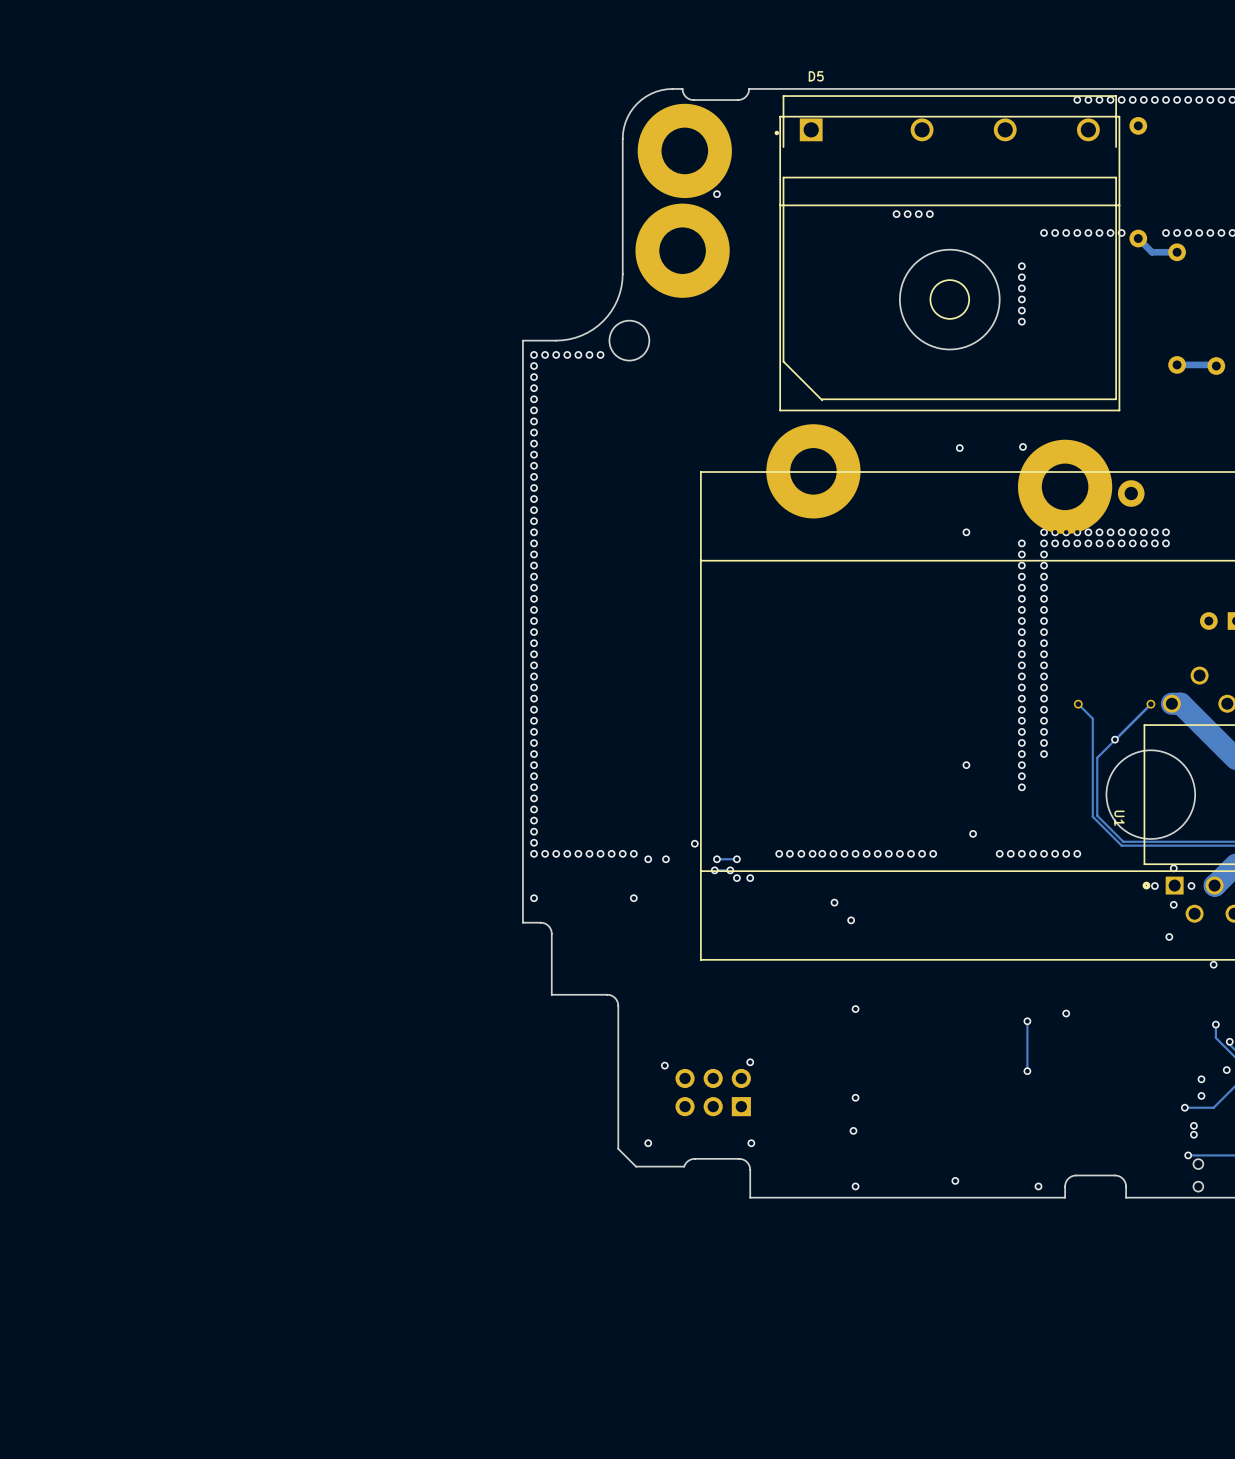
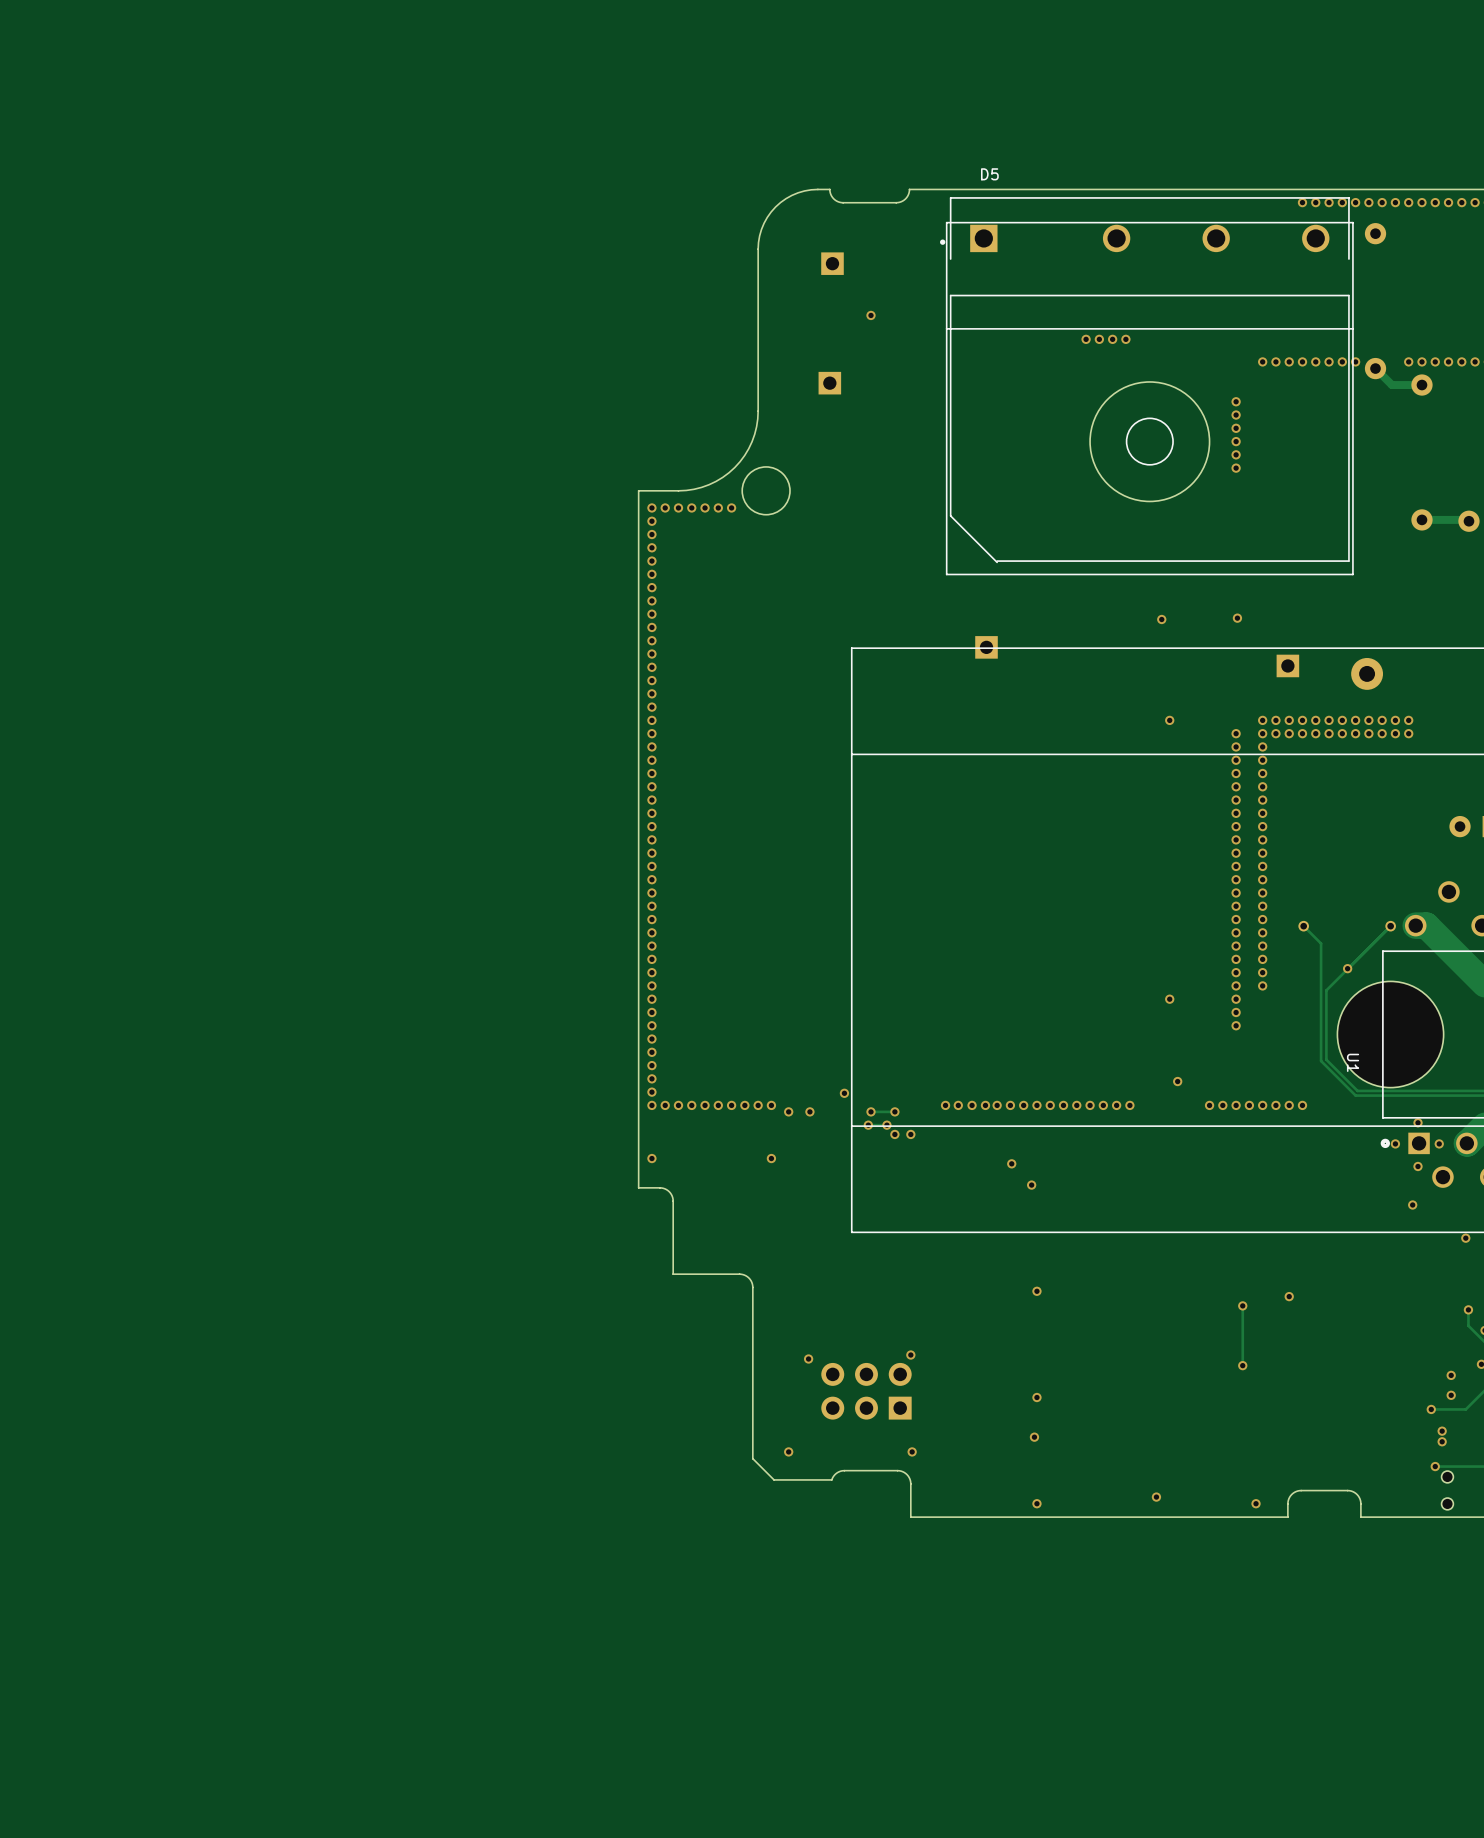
part footprint: [637, 103, 732, 199] -> [821, 252, 844, 275]
part footprint: [635, 203, 730, 298] -> [818, 371, 842, 395]
part footprint: [766, 424, 861, 519] -> [975, 636, 998, 659]
part footprint: [1017, 439, 1113, 534] -> [1276, 654, 1300, 678]

